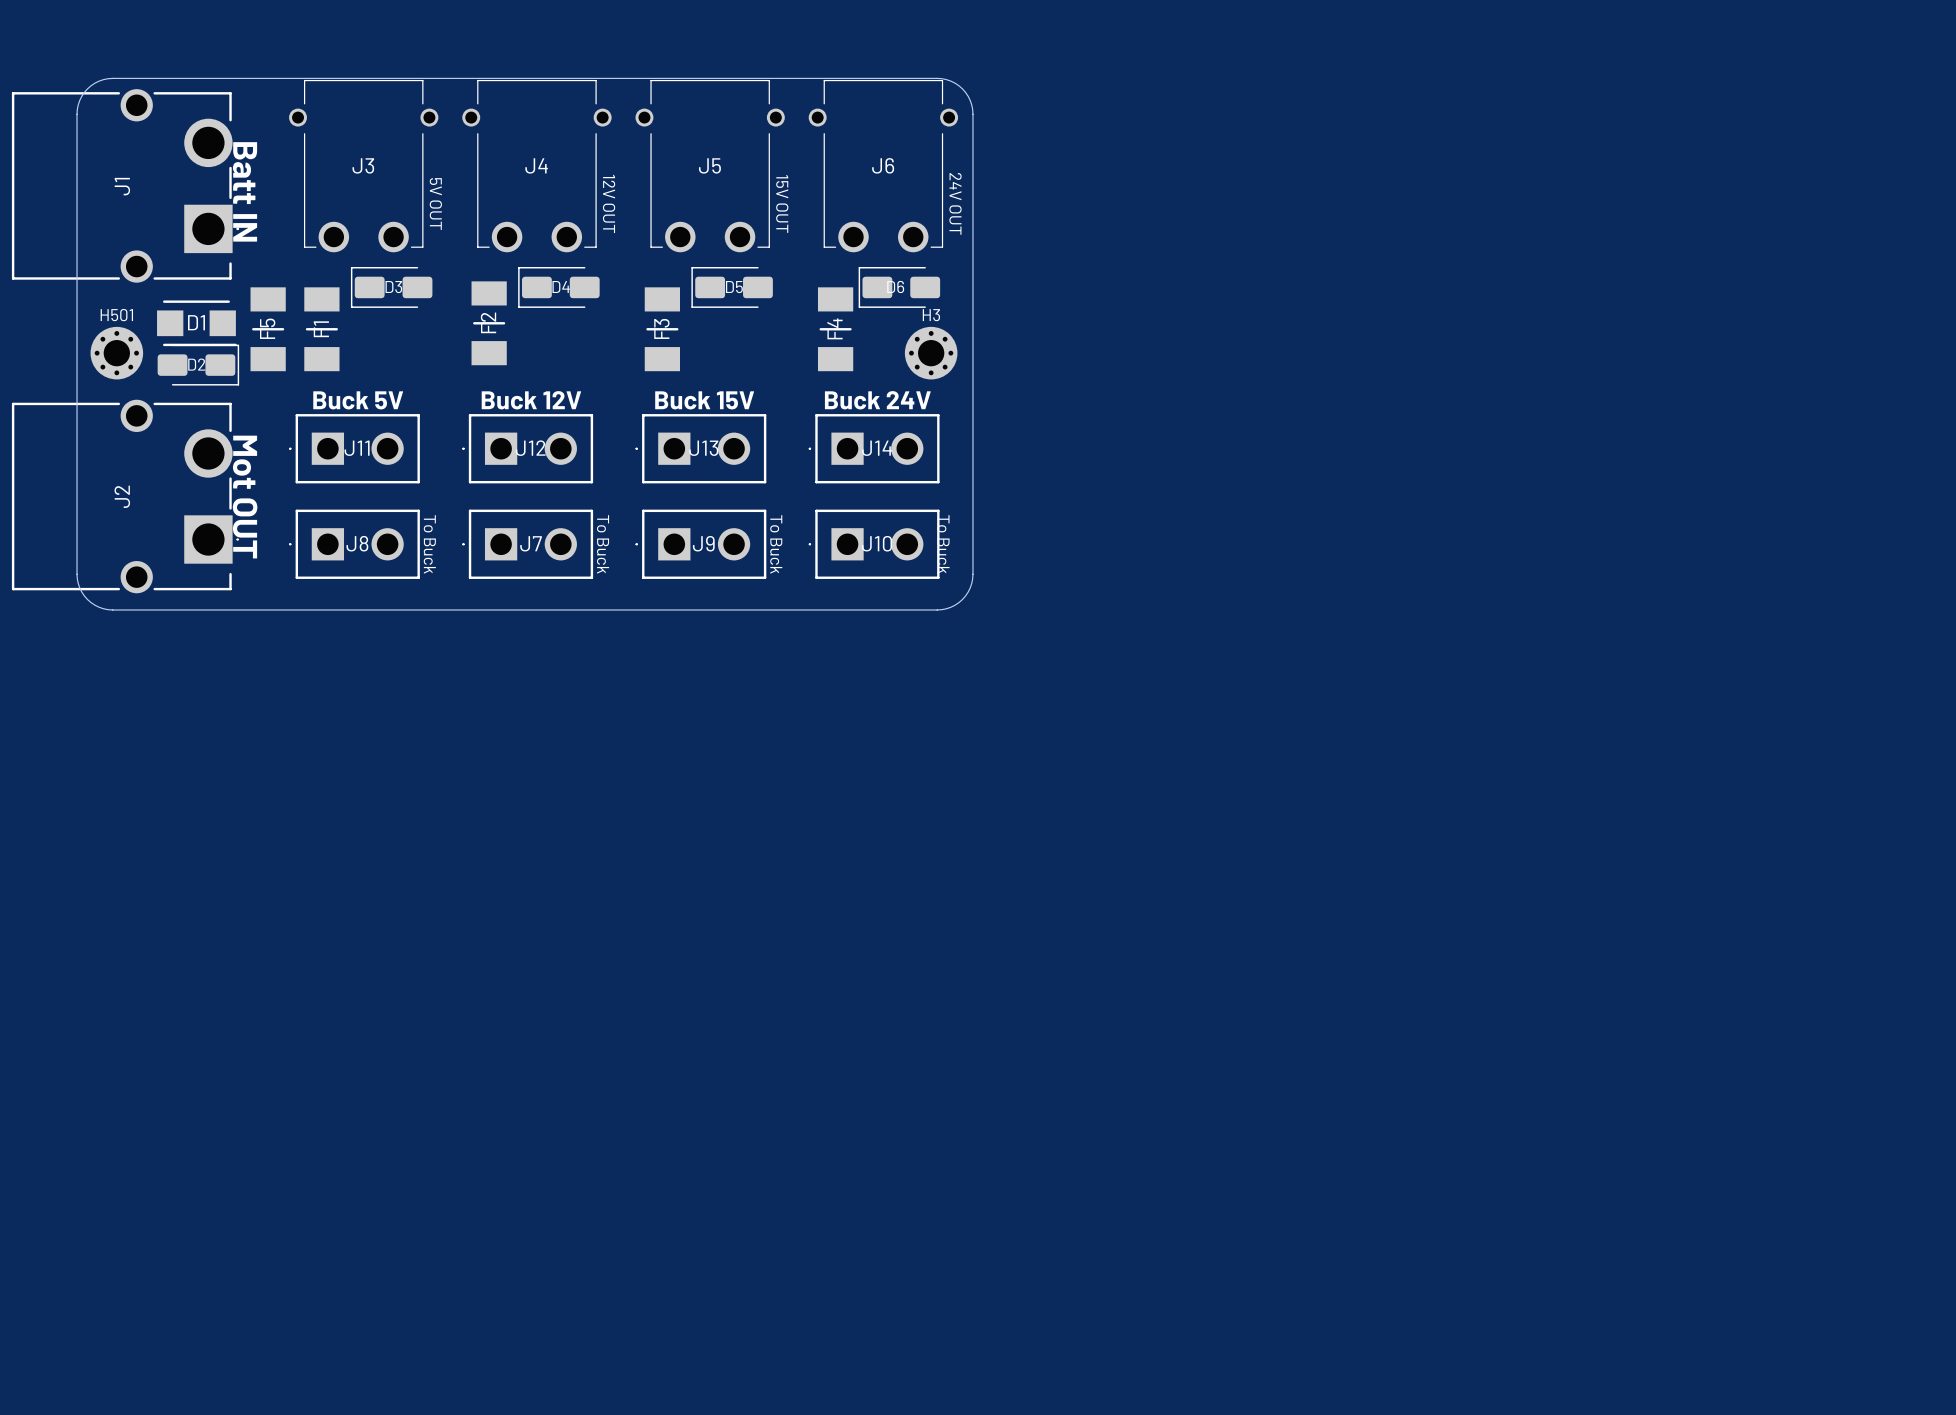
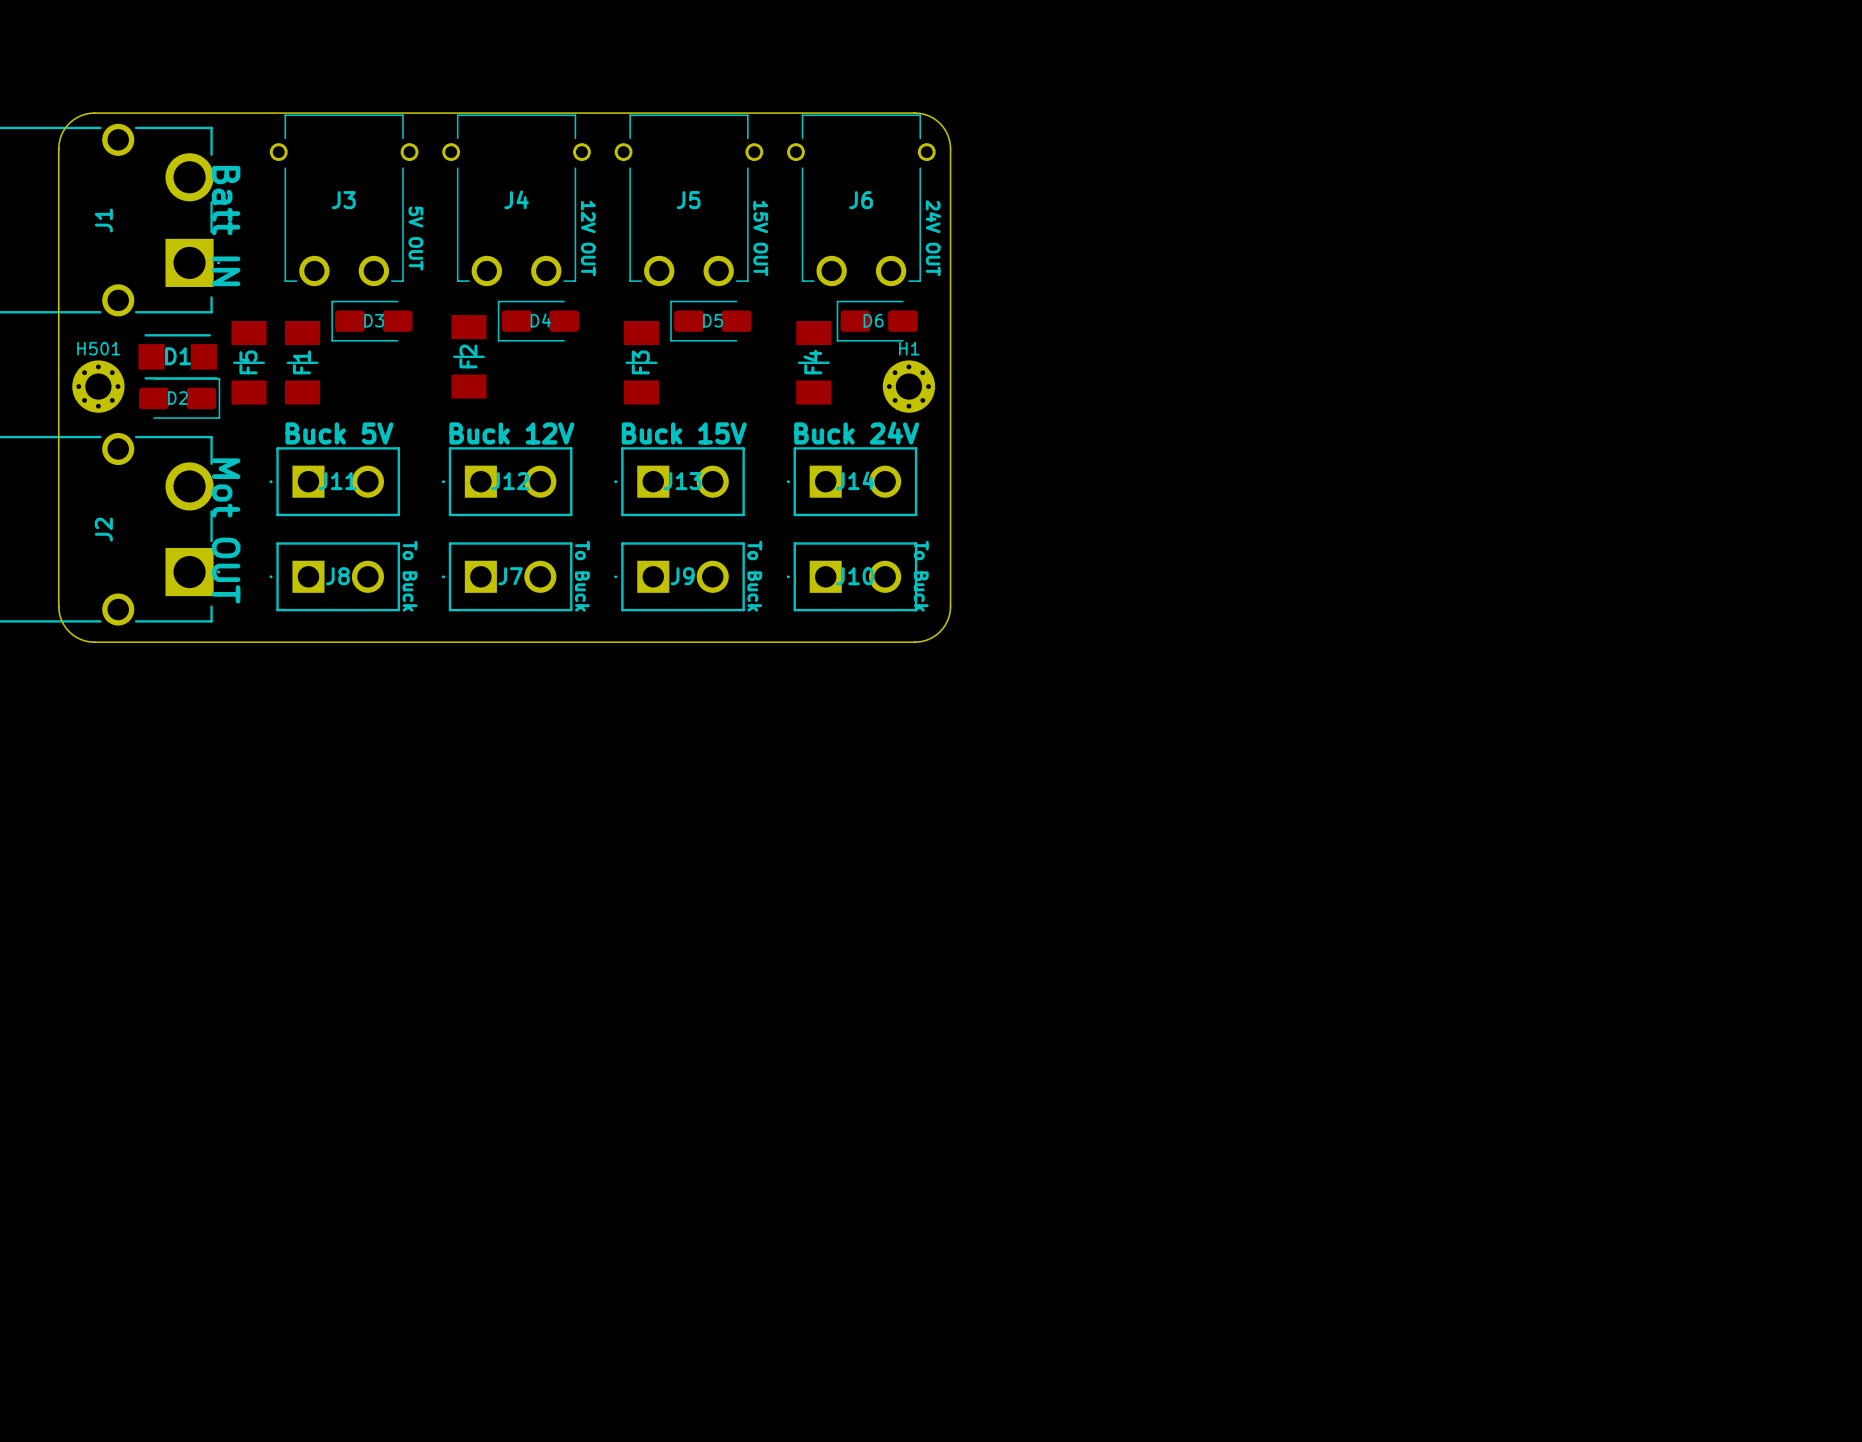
H3 name: H3 (931, 315) -> H1 (909, 348)

